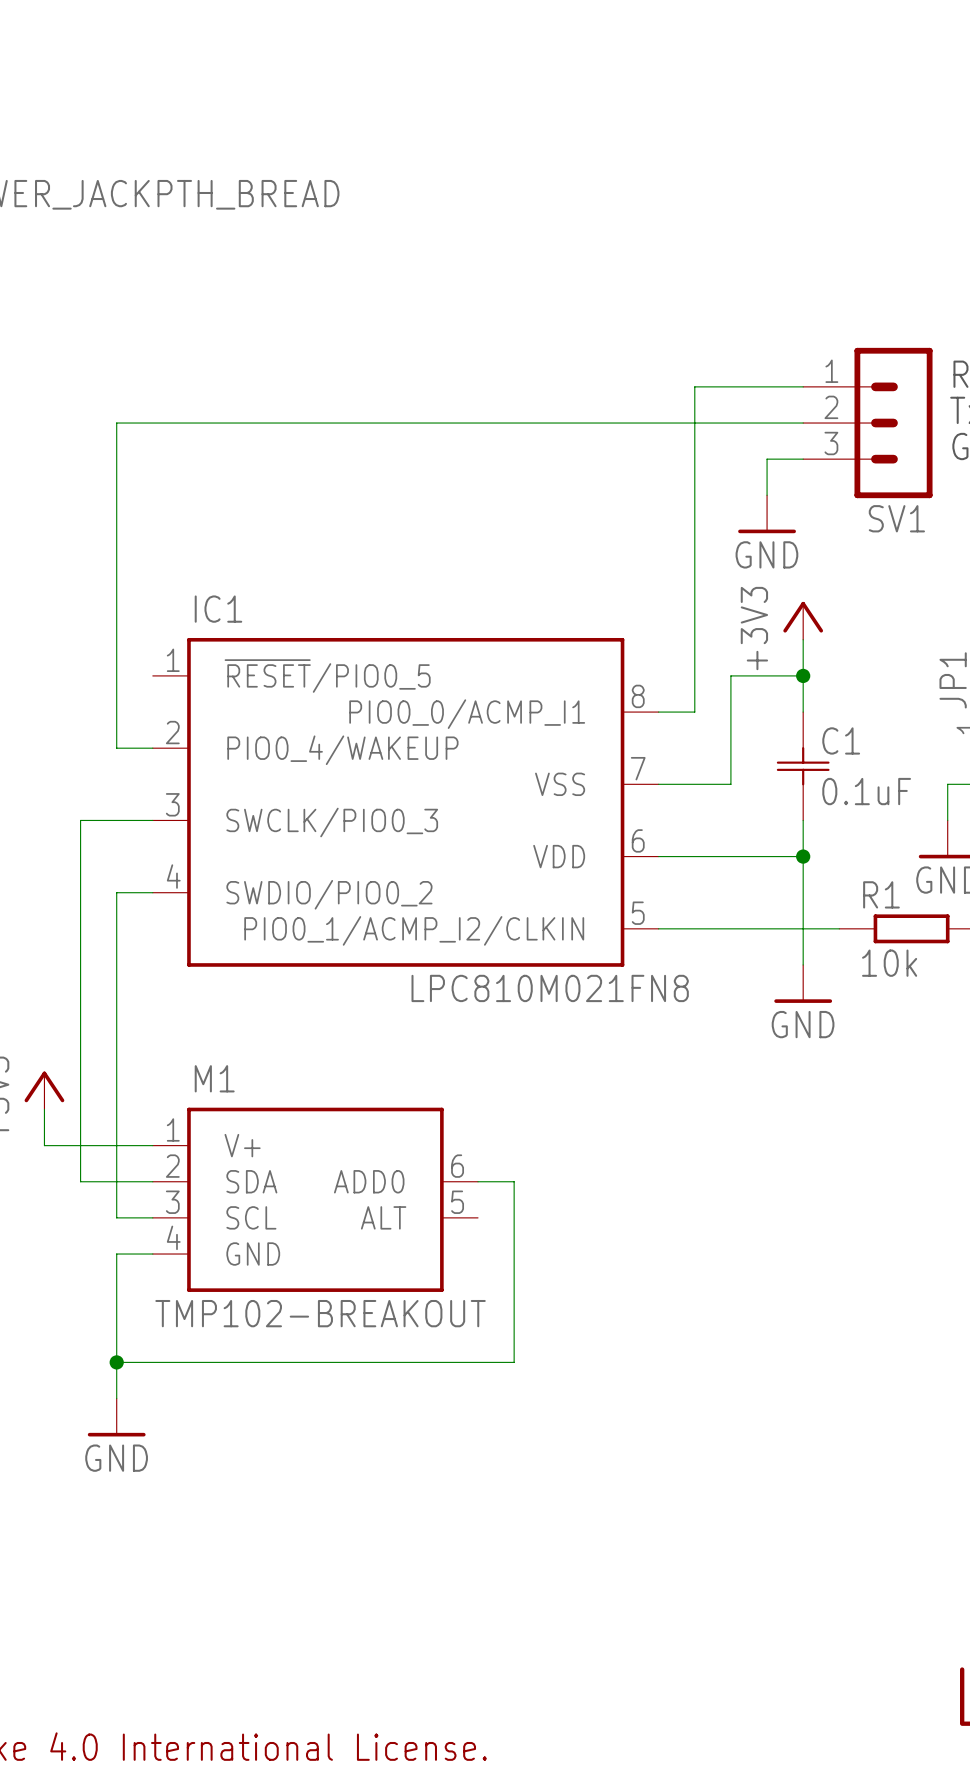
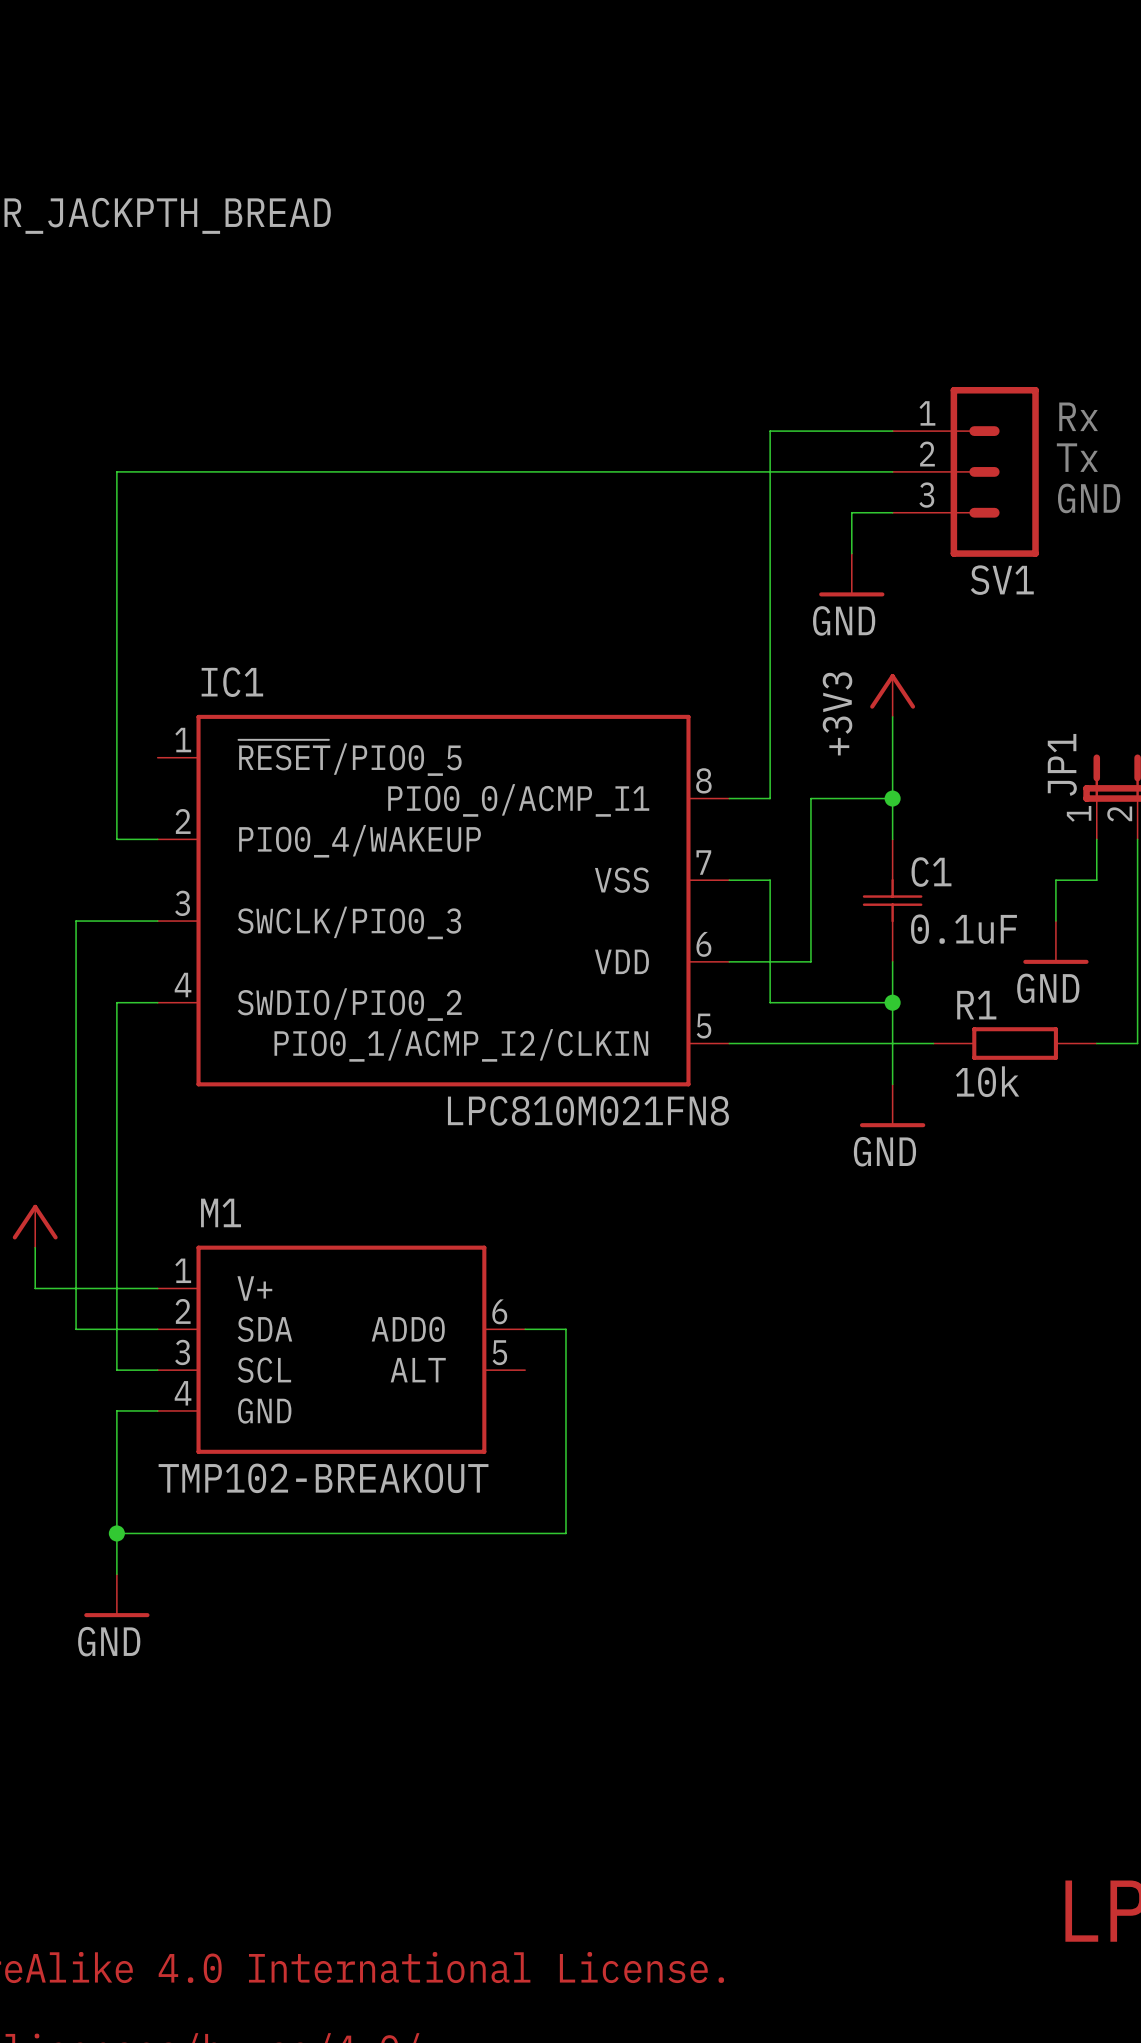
wire: (803, 675) (730, 675) (730, 712) -> (892, 839) (892, 798) (810, 798)
junction position: (803, 675) -> (892, 798)
C1 position: (803, 766) -> (892, 900)
wire: (694, 784) (730, 784) -> (770, 880) (770, 1002) (892, 1002)
wire: (803, 820) (803, 856) (730, 856) -> (810, 880) (810, 961)
junction position: (803, 856) -> (892, 1002)

